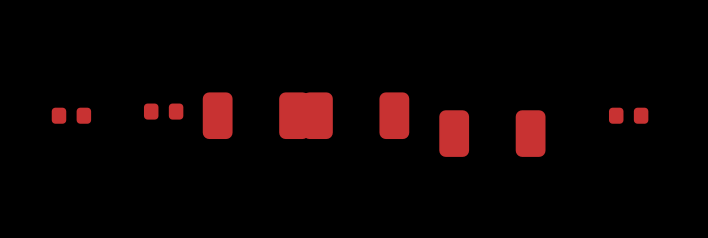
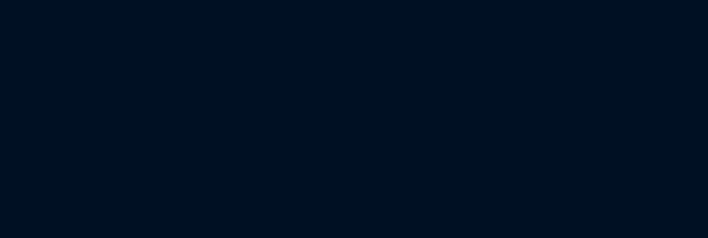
part: (163, 111) -> none
part: (71, 115) -> none
part: (255, 115) -> none
part: (356, 115) -> none
part: (628, 115) -> none
part: (492, 133) -> none

